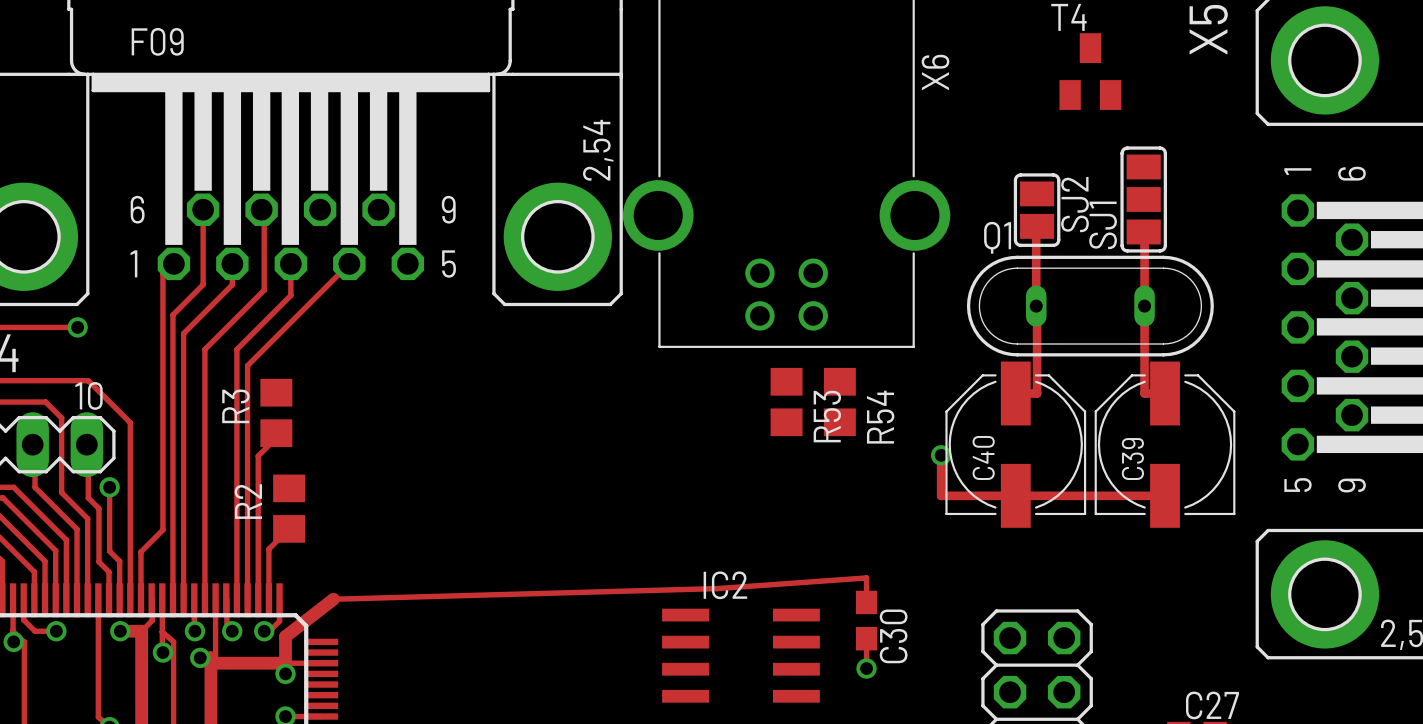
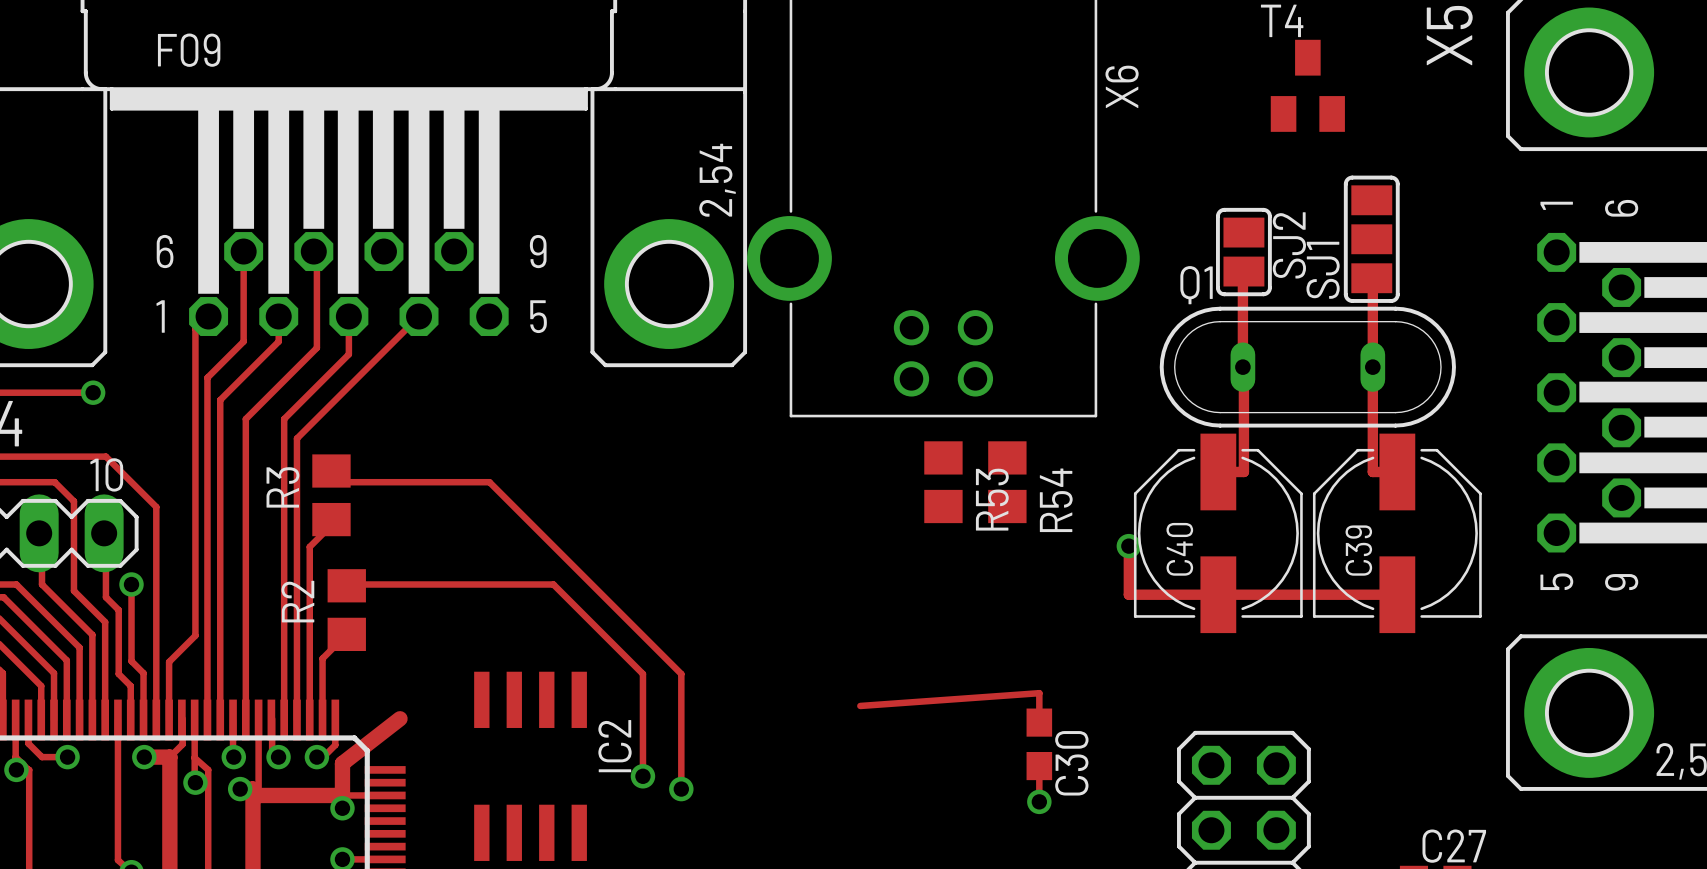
track: none -> (336, 469) (348, 482) (489, 482) (681, 674) (681, 789)
track: none -> (348, 584) (553, 584) (642, 674) (642, 776)
track: (717, 588) (333, 599) -> none
via: none -> (642, 776)
IC2 rotation: 0° (740, 655) -> 90° clockwise (530, 766)
IC2 position: (740, 655) -> (530, 766)
via: none -> (681, 789)

